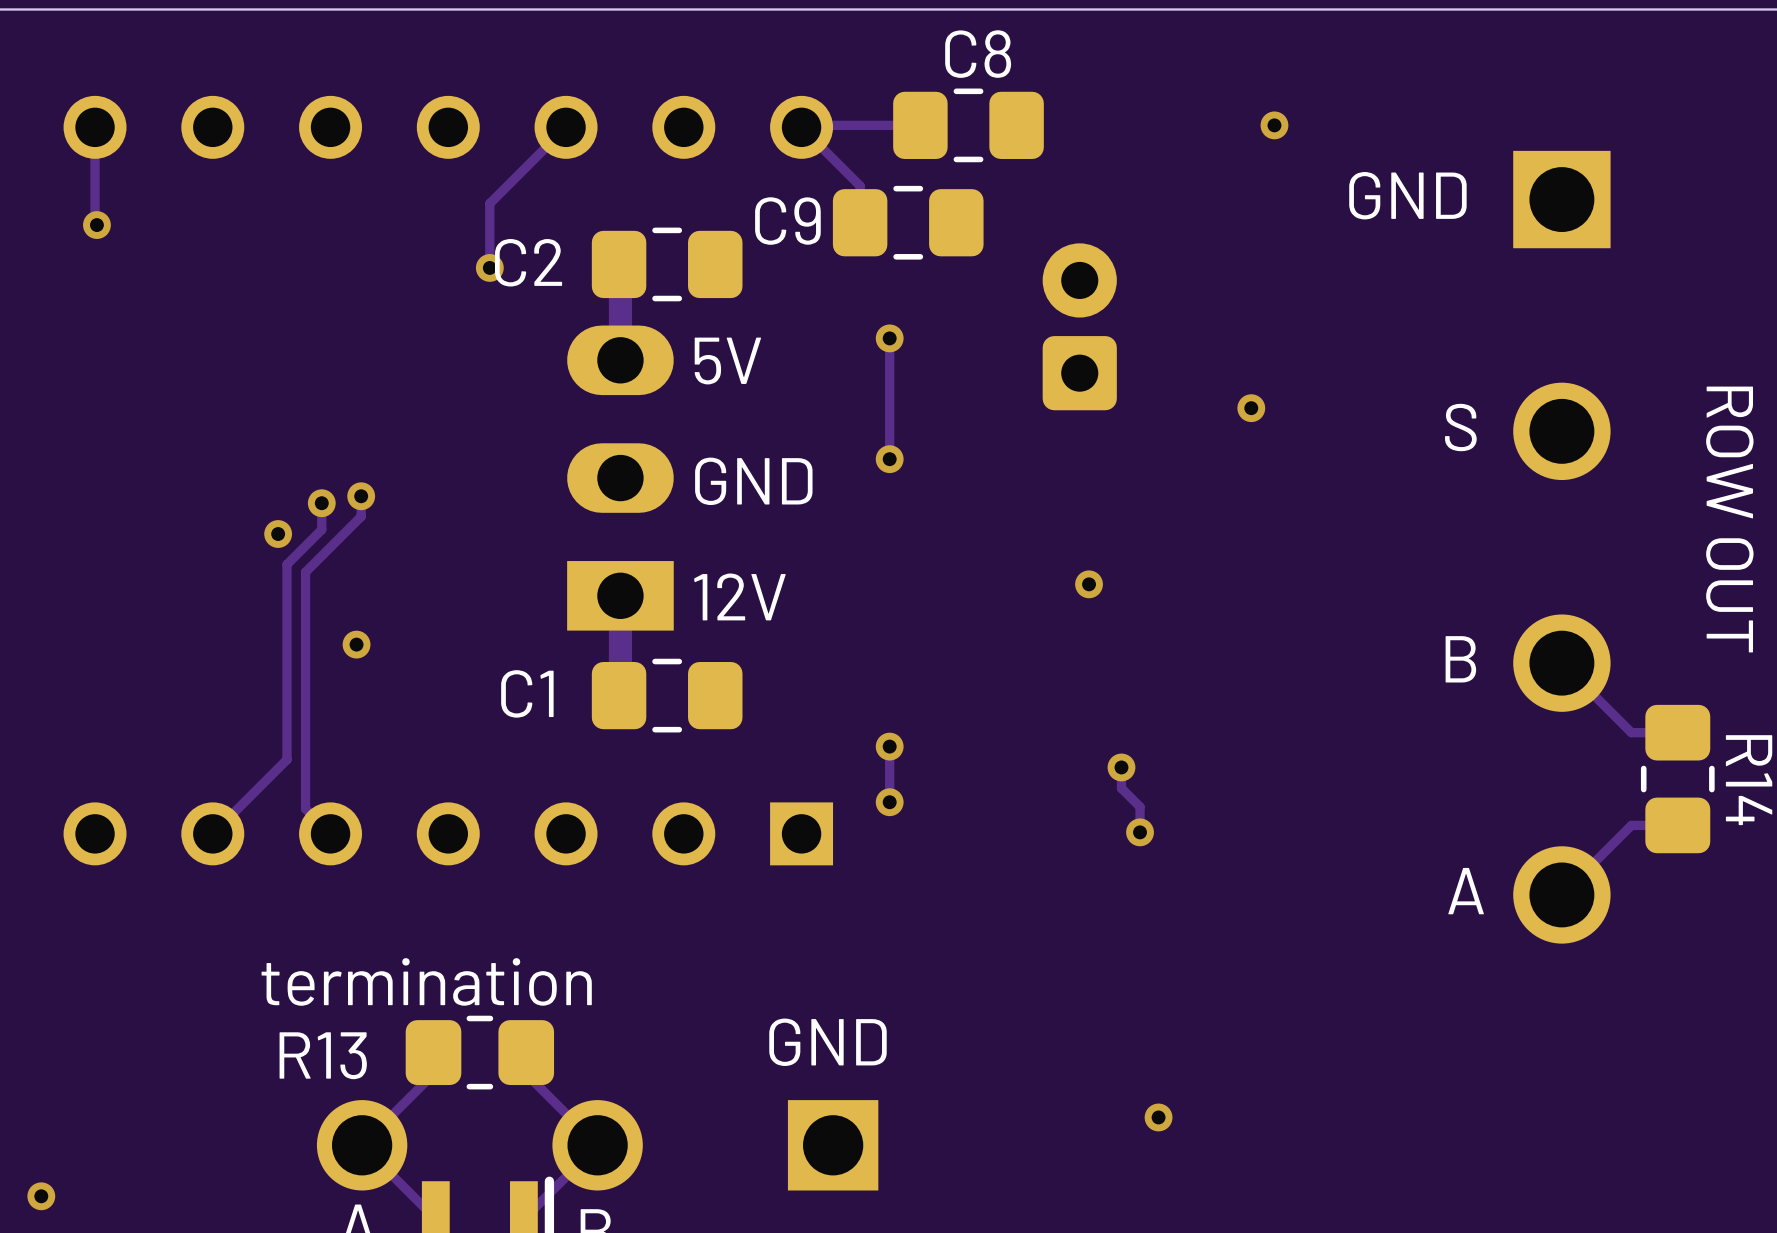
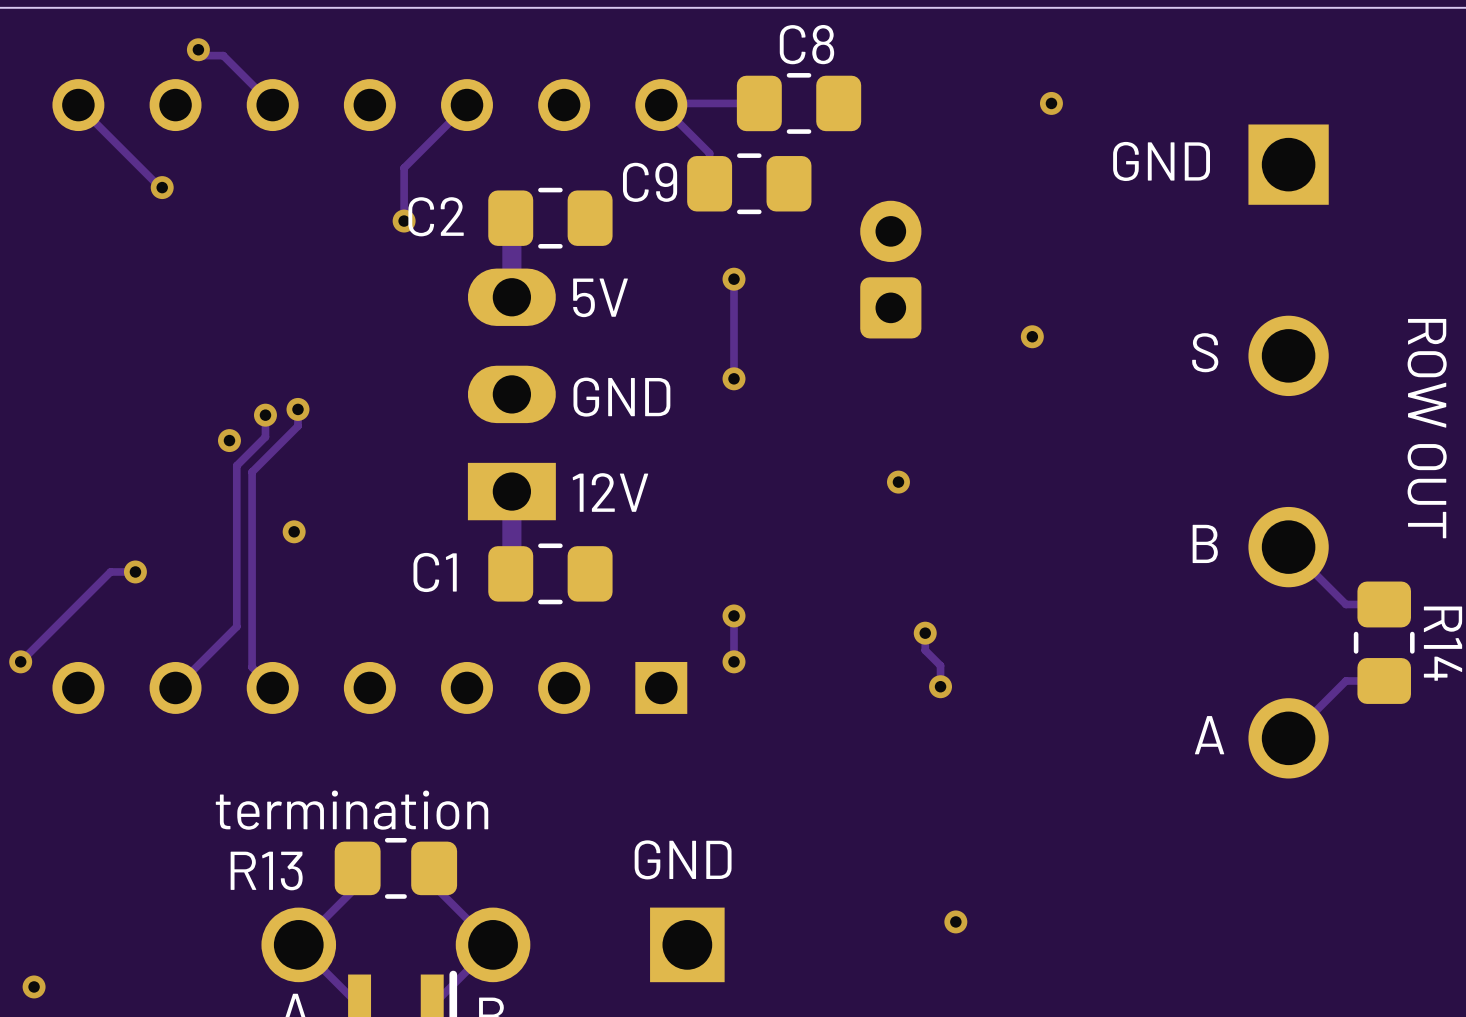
track: none -> (198, 49) (204, 55) (223, 55) (272, 105)
via: none -> (198, 49)
track: (95, 128) (95, 223) (96, 225) -> (78, 105) (162, 187)
via position: (96, 225) -> (162, 187)
track: none -> (135, 571) (110, 571) (20, 661)
via: none -> (135, 571)
via: none -> (20, 661)

